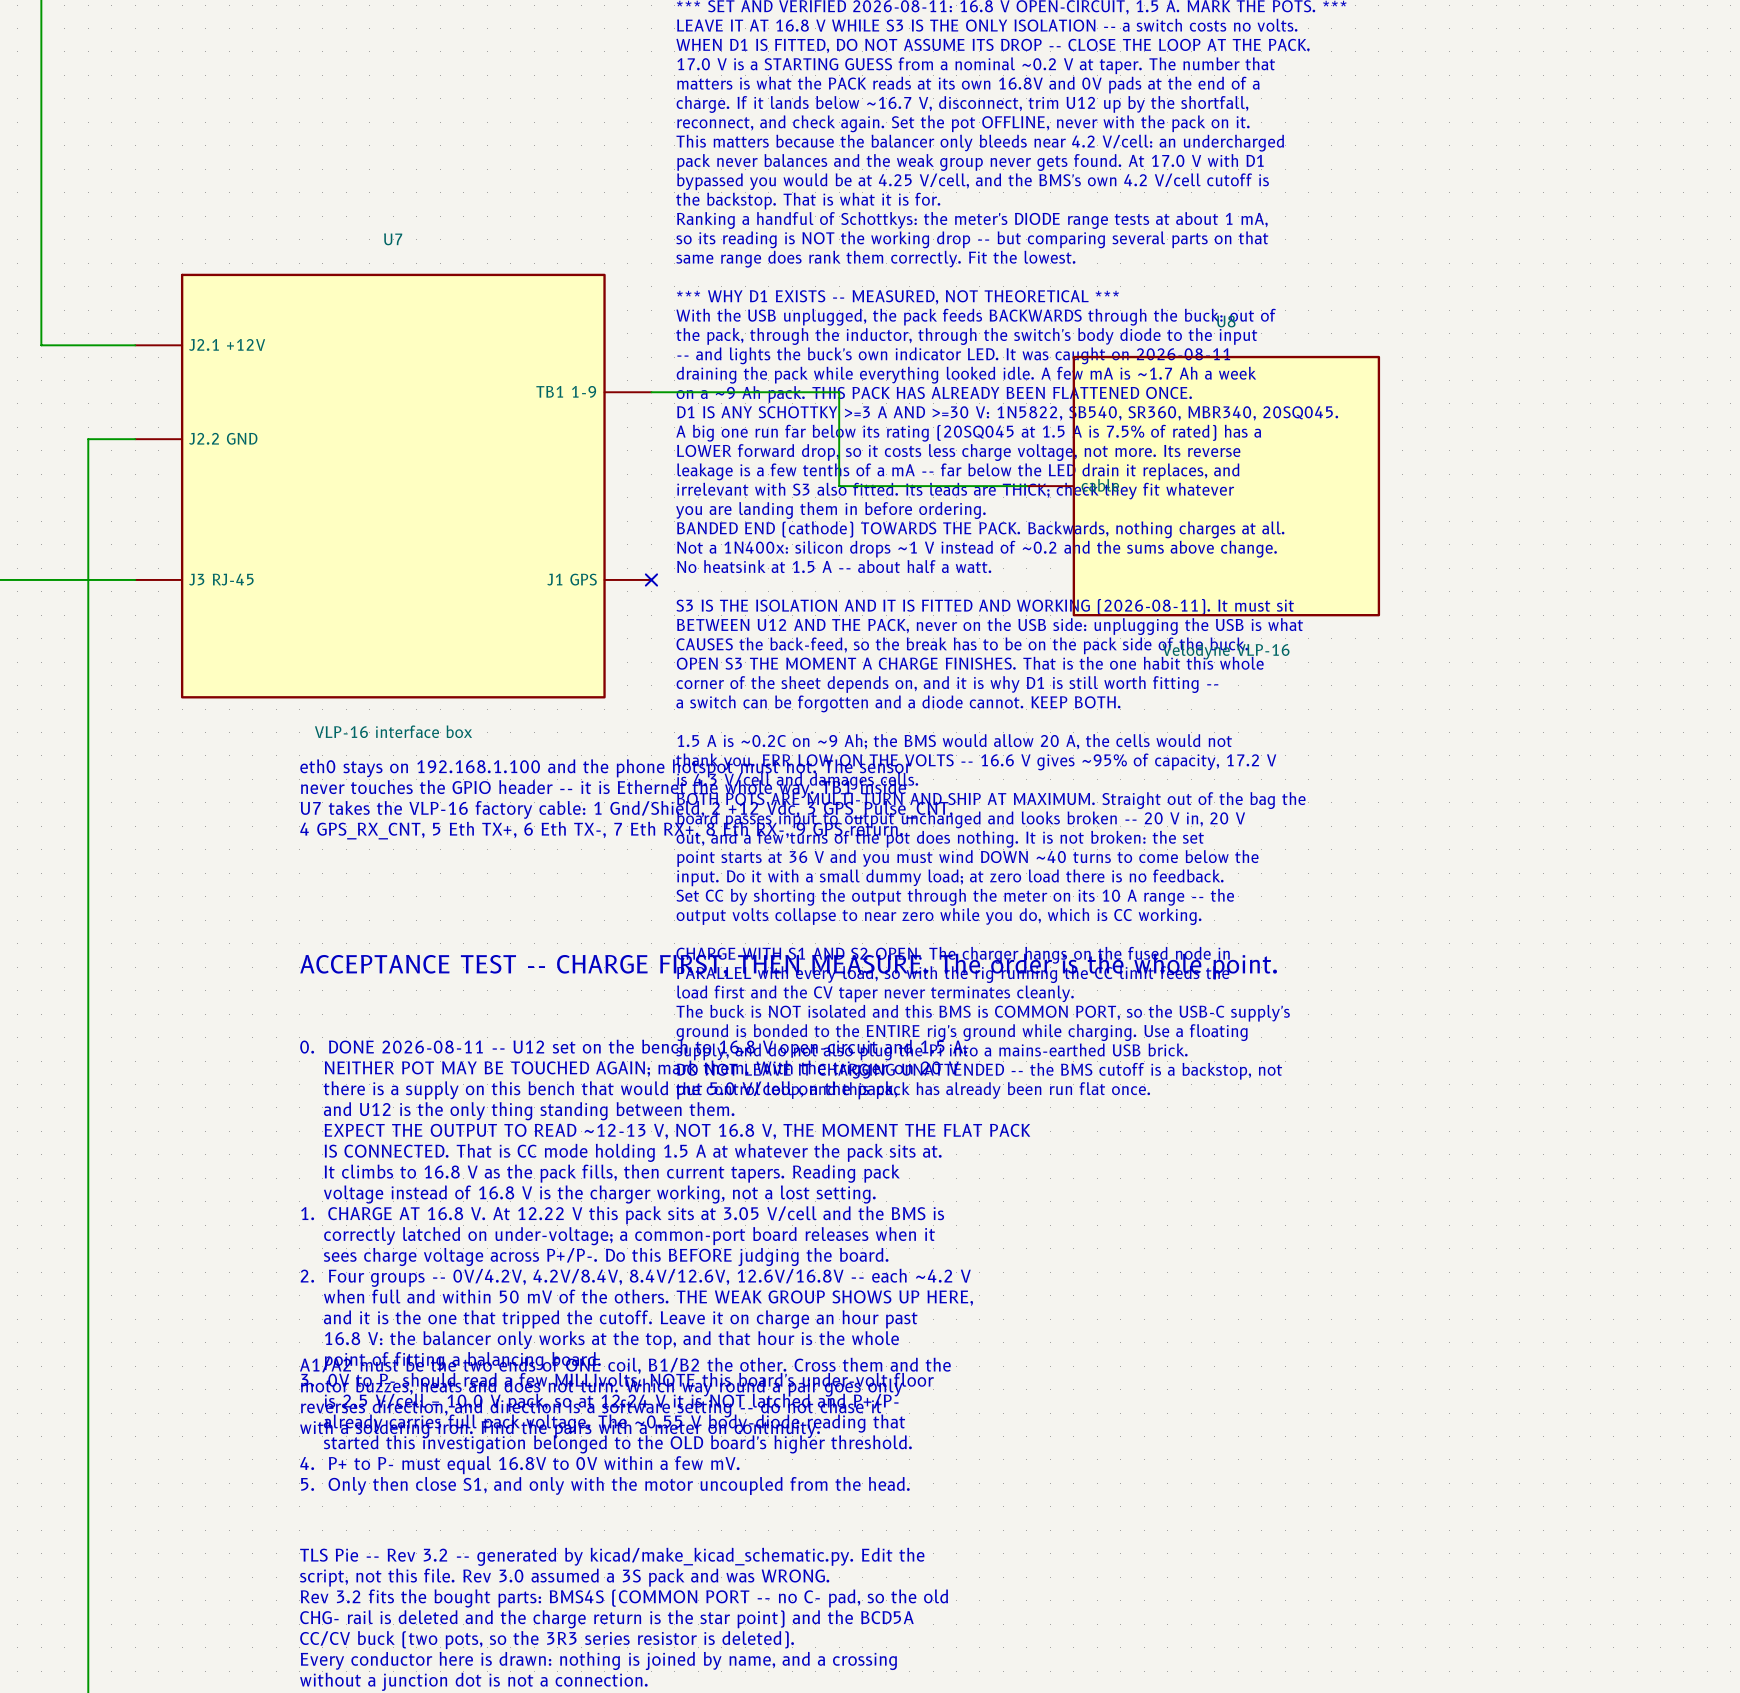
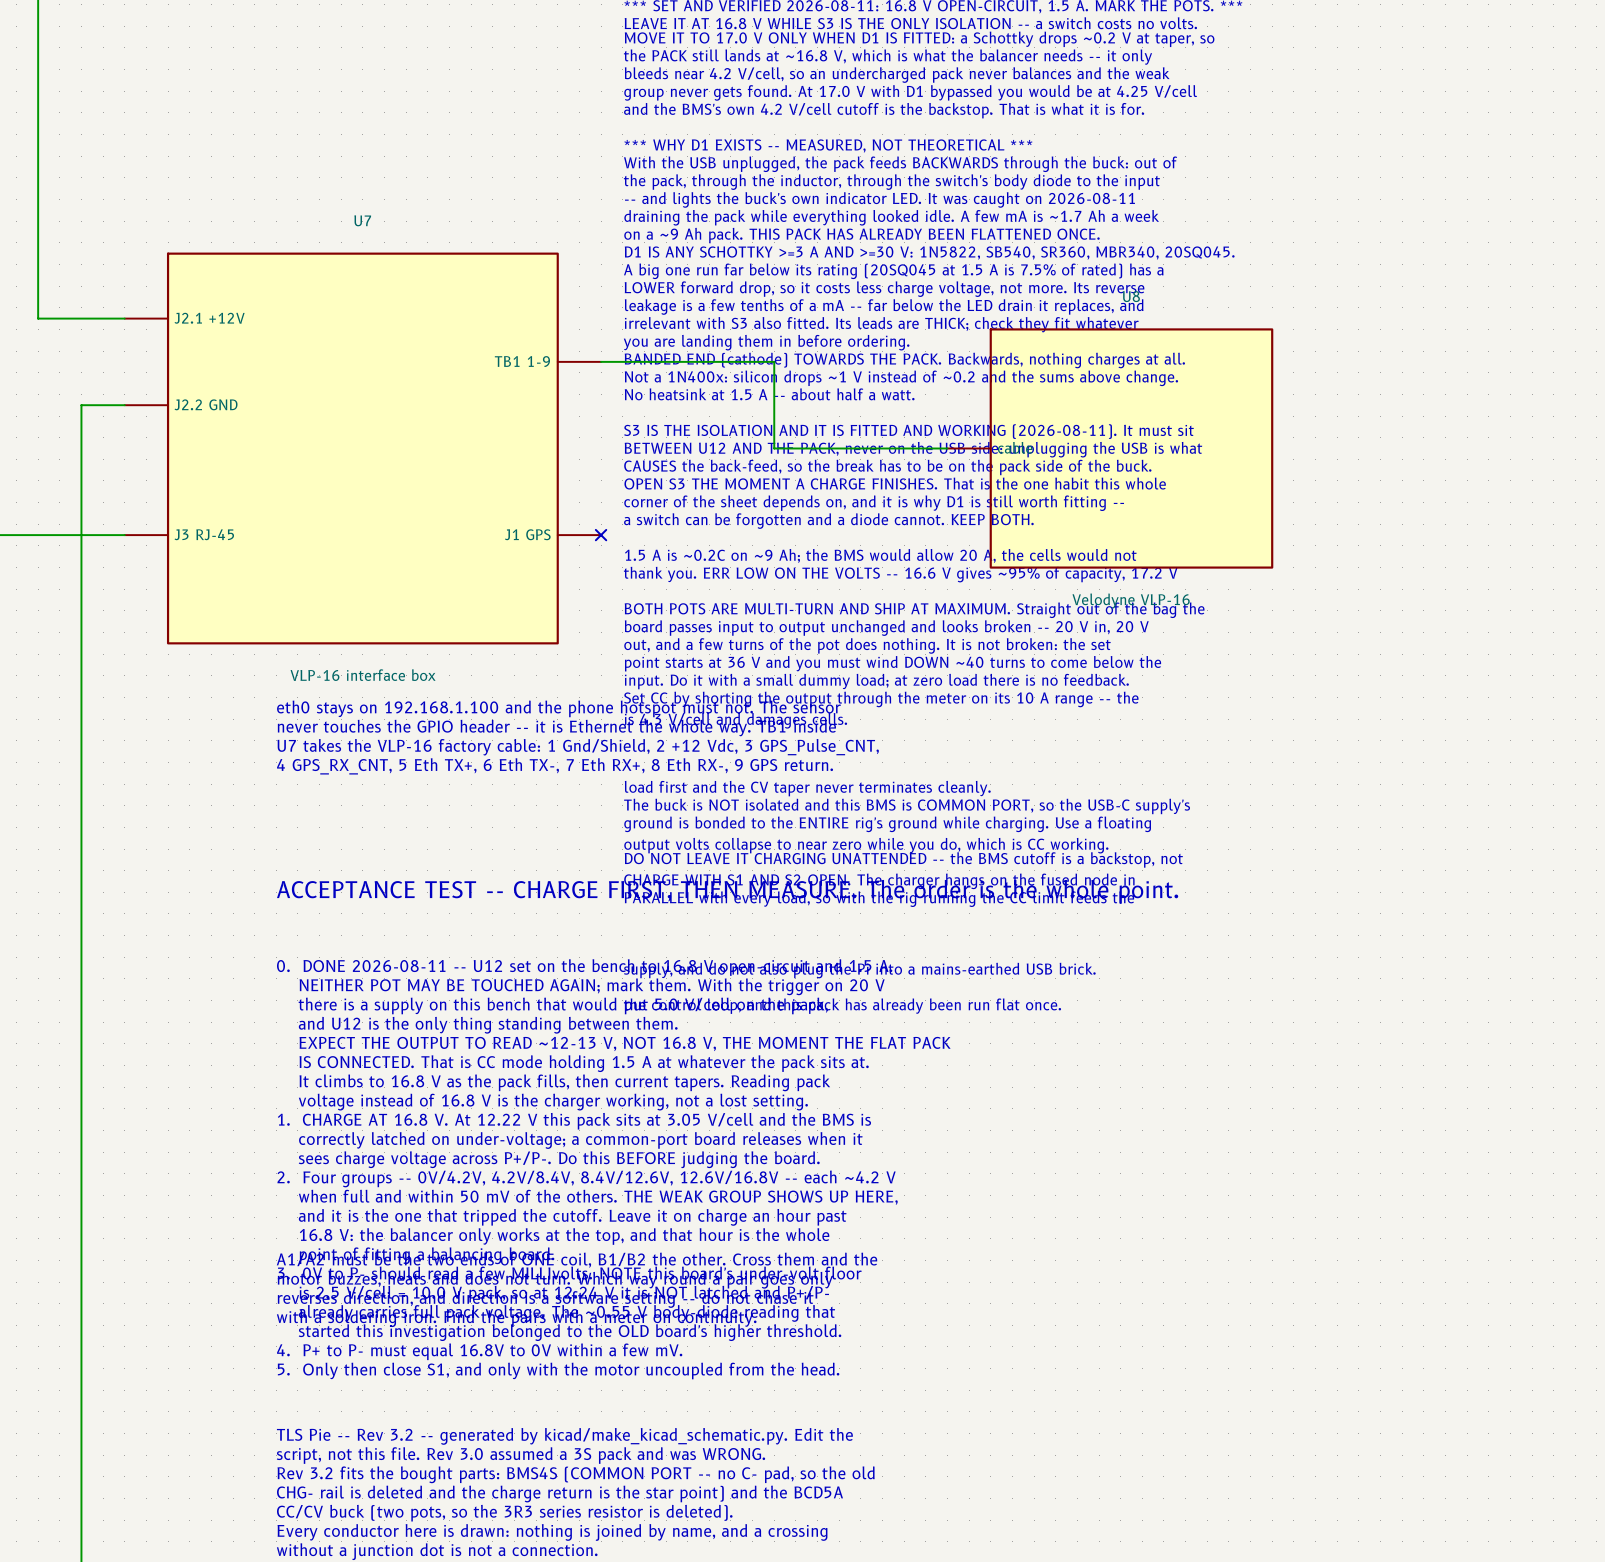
text: WHEN D1 IS FITTED, DO NOT ASSUME ITS DROP -- CLOSE THE LOOP AT THE PACK. (993, 46) -> MOVE IT TO 17.0 V ONLY WHEN D1 IS FITTED: a Schottky drops ~0.2 V at taper, so (919, 39)
text: 17.0 V is a STARTING GUESS from a nominal ~0.2 V at taper. The number that (976, 65) -> the PACK still lands at ~16.8 V, which is what the balancer needs -- it only (888, 57)
text: matters is what the PACK reads at its own 16.8V and 0V pads at the end of a (968, 85) -> bleeds near 4.2 V/cell, so an undercharged pack never balances and the weak (897, 75)
text: charge. If it lands below ~16.7 V, disconnect, trim U12 up by the shortfall, (962, 104) -> group never gets found. At 17.0 V with D1 bypassed you would be at 4.25 V/cell (910, 92)
text: reconnect, and check again. Set the pot OFFLINE, never with the pack on it. (963, 123) -> and the BMS's own 4.2 V/cell cutoff is the backstop. That is what it is for. (884, 110)
text: This matters because the balancer only bleeds near 4.2 V/cell: an undercharged (980, 143) -> none
text: pack never balances and the weak group never gets found. At 17.0 V with D1 (970, 162) -> none
text: bypassed you would be at 4.25 V/cell, and the BMS's own 4.2 V/cell cutoff is (973, 181) -> none
text: the backstop. That is what it is for. (808, 201) -> none
text: Ranking a handful of Schottkys: the meter's DIODE range tests at about 1 mA, (972, 220) -> none
text: so its reading is NOT the working drop -- but comparing several parts on that (972, 239) -> none
text: same range does rank them correctly. Fit the lowest. (875, 259) -> none
text position: *** WHY D1 EXISTS -- MEASURED, NOT THEORETICAL *** (897, 297) -> *** WHY D1 EXISTS -- MEASURED, NOT THEORETICAL *** (828, 146)
text position: With the USB unplugged, the pack feeds BACKWARDS through the buck: out of (976, 317) -> With the USB unplugged, the pack feeds BACKWARDS through the buck: out of (900, 164)
text position: the pack, through the inductor, through the switch's body diode to the input (966, 336) -> the pack, through the inductor, through the switch's body diode to the input (891, 182)
text position: -- and lights the buck's own indicator LED. It was caught on 2026-08-11 (953, 355) -> -- and lights the buck's own indicator LED. It was caught on 2026-08-11 (879, 199)
text position: draining the pack while everything looked idle. A few mA is ~1.7 Ah a week (966, 375) -> draining the pack while everything looked idle. A few mA is ~1.7 Ah a week (891, 217)
text position: on a ~9 Ah pack. THIS PACK HAS ALREADY BEEN FLATTENED ONCE. (934, 394) -> on a ~9 Ah pack. THIS PACK HAS ALREADY BEEN FLATTENED ONCE. (861, 235)
text position: D1 IS ANY SCHOTTKY >=3 A AND >=30 V: 1N5822, SB540, SR360, MBR340, 20SQ045. (1007, 413) -> D1 IS ANY SCHOTTKY >=3 A AND >=30 V: 1N5822, SB540, SR360, MBR340, 20SQ045. (929, 253)
text position: A big one run far below its rating (20SQ045 at 1.5 A is 7.5% of rated) has a (968, 433) -> A big one run far below its rating (20SQ045 at 1.5 A is 7.5% of rated) has a (893, 271)
text position: LOWER forward drop, so it costs less charge voltage, not more. Its reverse (958, 452) -> LOWER forward drop, so it costs less charge voltage, not more. Its reverse (884, 289)
text position: leakage is a few tenths of a mA -- far below the LED drain it replaces, and (958, 471) -> leakage is a few tenths of a mA -- far below the LED drain it replaces, and (884, 306)
text position: irrelevant with S3 also fitted. Its leads are THICK; check they fit whatever (955, 491) -> irrelevant with S3 also fitted. Its leads are THICK; check they fit whatever (881, 324)
text position: you are landing them in before ordering. (830, 510) -> you are landing them in before ordering. (766, 342)
text position: BANDED END (cathode) TOWARDS THE PACK. Backwards, nothing charges at all. (980, 529) -> BANDED END (cathode) TOWARDS THE PACK. Backwards, nothing charges at all. (904, 360)
text position: Not a 1N400x: silicon drops ~1 V instead of ~0.2 and the sums above change. (977, 549) -> Not a 1N400x: silicon drops ~1 V instead of ~0.2 and the sums above change. (901, 378)
text position: No heatsink at 1.5 A -- about half a watt. (834, 566) -> No heatsink at 1.5 A -- about half a watt. (769, 394)
text position: S3 IS THE ISOLATION AND IT IS FITTED AND WORKING (2026-08-11). It must sit (985, 606) -> S3 IS THE ISOLATION AND IT IS FITTED AND WORKING (2026-08-11). It must sit (908, 431)
text position: BETWEEN U12 AND THE PACK, never on the USB side: unplugging the USB is what (990, 626) -> BETWEEN U12 AND THE PACK, never on the USB side: unplugging the USB is what (913, 449)
text position: CAUSES the back-feed, so the break has to be on the pack side of the buck. (962, 645) -> CAUSES the back-feed, so the break has to be on the pack side of the buck. (887, 467)
text position: OPEN S3 THE MOMENT A CHARGE FINISHES. That is the one habit this whole (970, 663) -> OPEN S3 THE MOMENT A CHARGE FINISHES. That is the one habit this whole (895, 483)
text position: corner of the sheet depends on, and it is why D1 is still worth fitting -- (947, 684) -> corner of the sheet depends on, and it is why D1 is still worth fitting -- (874, 503)
text position: a switch can be forgotten and a diode cannot. KEEP BOTH. (898, 703) -> a switch can be forgotten and a diode cannot. KEEP BOTH. (828, 521)
text position: 1.5 A is ~0.2C on ~9 Ah; the BMS would allow 20 A, the cells would not (954, 741) -> 1.5 A is ~0.2C on ~9 Ah; the BMS would allow 20 A, the cells would not (880, 555)
text position: thank you. ERR LOW ON THE VOLTS -- 16.6 V gives ~95% of capacity, 17.2 V (976, 761) -> thank you. ERR LOW ON THE VOLTS -- 16.6 V gives ~95% of capacity, 17.2 V (900, 574)
text position: BOTH POTS ARE MULTI-TURN AND SHIP AT MAXIMUM. Straight out of the bag the (991, 800) -> BOTH POTS ARE MULTI-TURN AND SHIP AT MAXIMUM. Straight out of the bag the (914, 610)
text position: board passes input to output unchanged and looks broken -- 20 V in, 20 V (961, 819) -> board passes input to output unchanged and looks broken -- 20 V in, 20 V (886, 628)
text position: out, and a few turns of the pot does nothing. It is not broken: the set (940, 839) -> out, and a few turns of the pot does nothing. It is not broken: the set (867, 645)
text position: point starts at 36 V and you must wind DOWN ~40 turns to come below the (967, 858) -> point starts at 36 V and you must wind DOWN ~40 turns to come below the (893, 663)
text position: input. Do it with a small dummy load; at zero load there is no feedback. (950, 877) -> input. Do it with a small dummy load; at zero load there is no feedback. (876, 681)
text position: Set CC by shorting the output through the meter on its 10 A range -- the (955, 897) -> Set CC by shorting the output through the meter on its 10 A range -- the (881, 699)
text position: load first and the CV taper never terminates cleanly. (875, 993) -> load first and the CV taper never terminates cleanly. (807, 788)
text position: The buck is NOT isolated and this BMS is COMMON PORT, so the USB-C supply's (983, 1013) -> The buck is NOT isolated and this BMS is COMMON PORT, so the USB-C supply's (907, 806)
text position: ground is bonded to the ENTIRE rig's ground while charging. Use a floating (962, 1032) -> ground is bonded to the ENTIRE rig's ground while charging. Use a floating (887, 824)
text position: DO NOT LEAVE IT CHARGING UNATTENDED -- the BMS cutoff is a backstop, not (979, 1071) -> DO NOT LEAVE IT CHARGING UNATTENDED -- the BMS cutoff is a backstop, not (903, 859)

